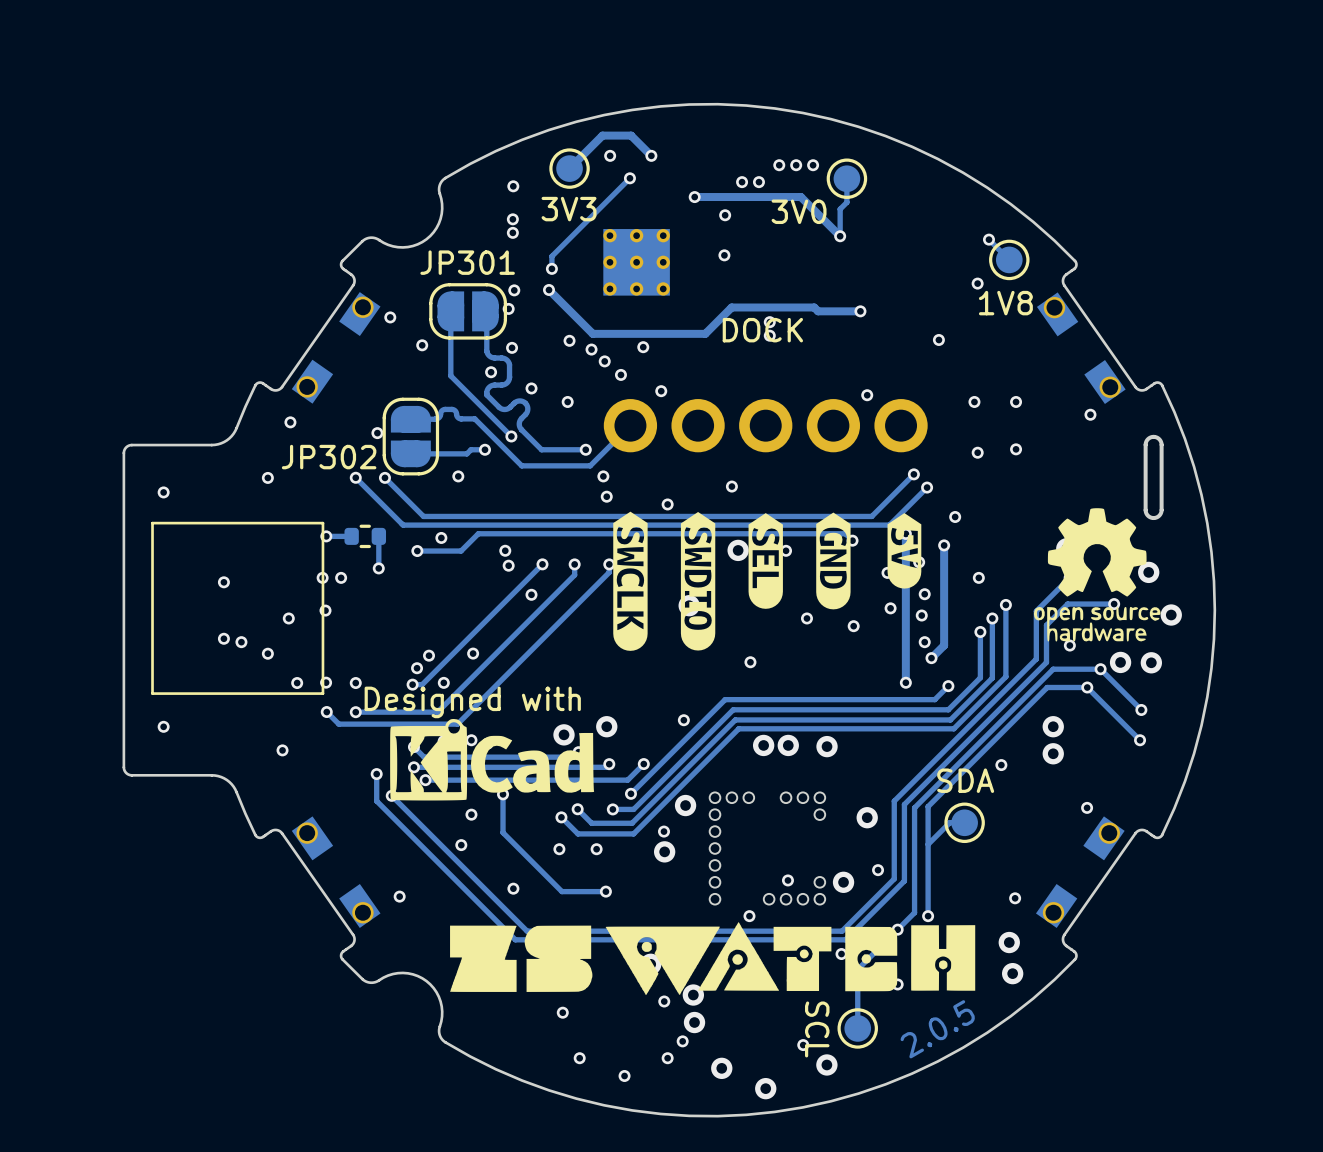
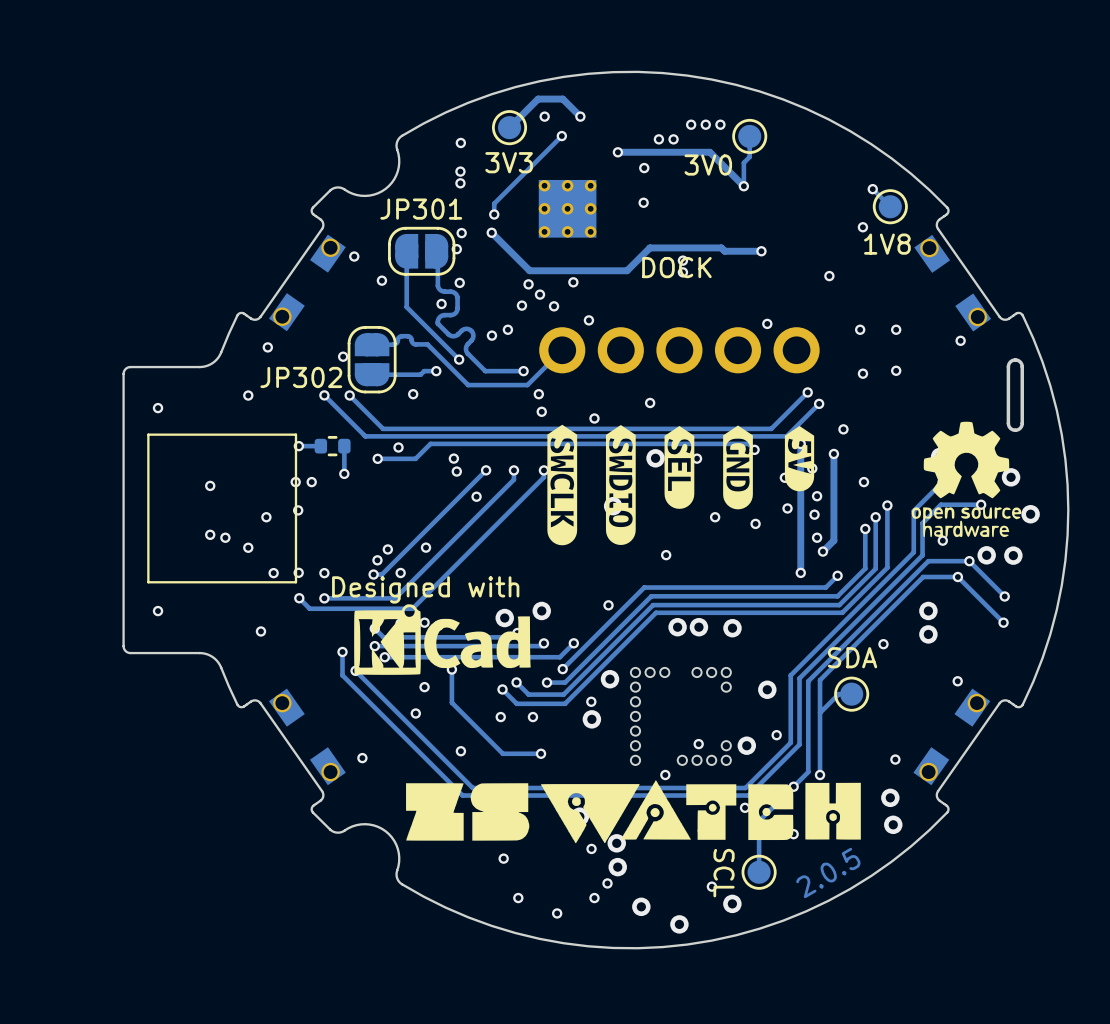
via: (569, 340) -> none
via: none -> (521, 305)
via: (531, 388) -> none
via: none -> (491, 335)

